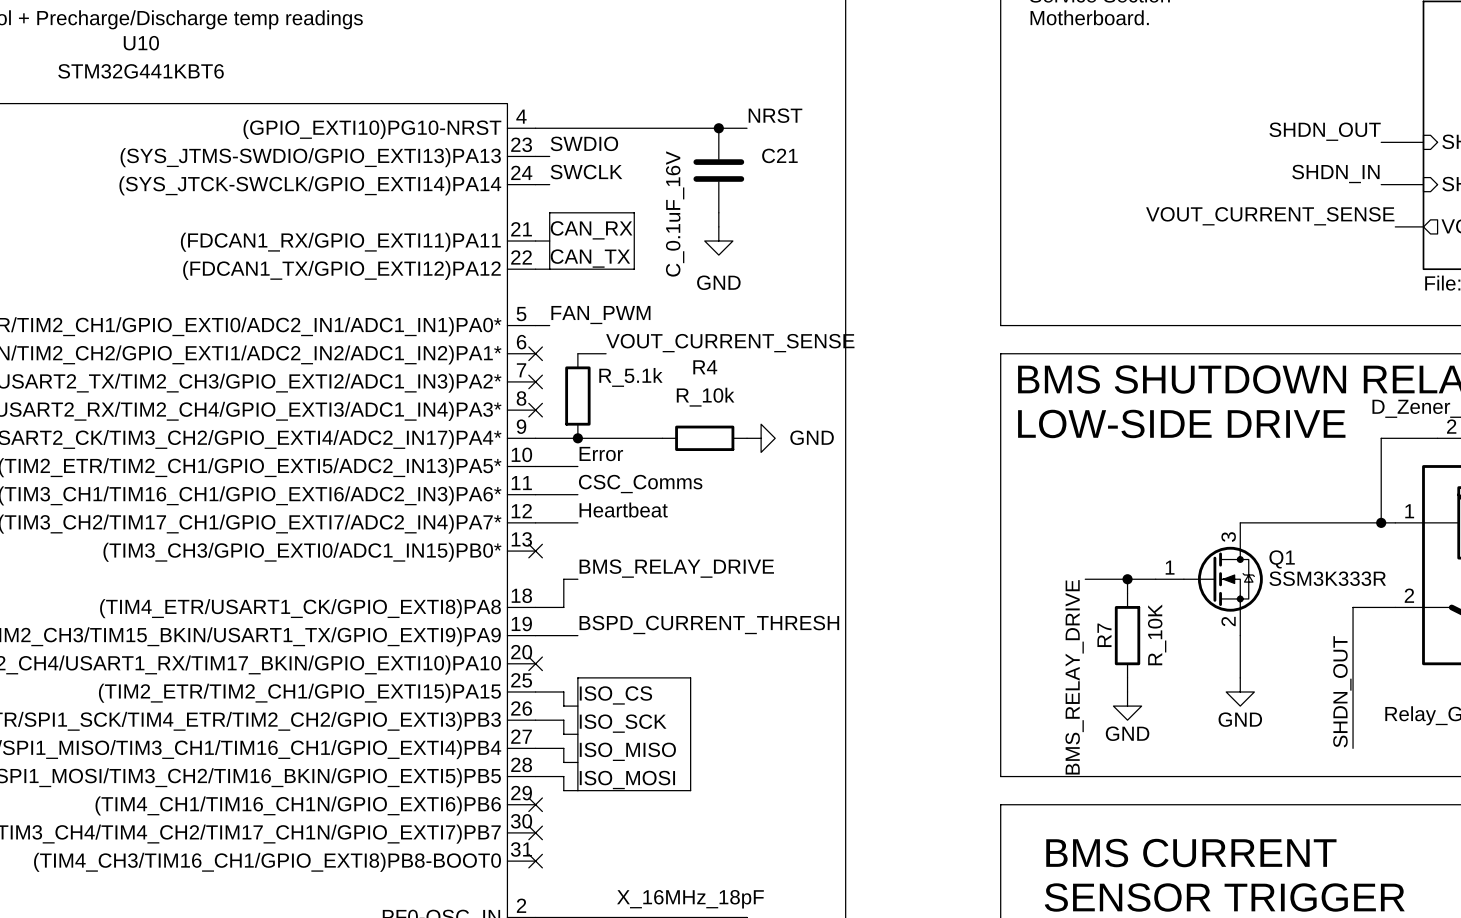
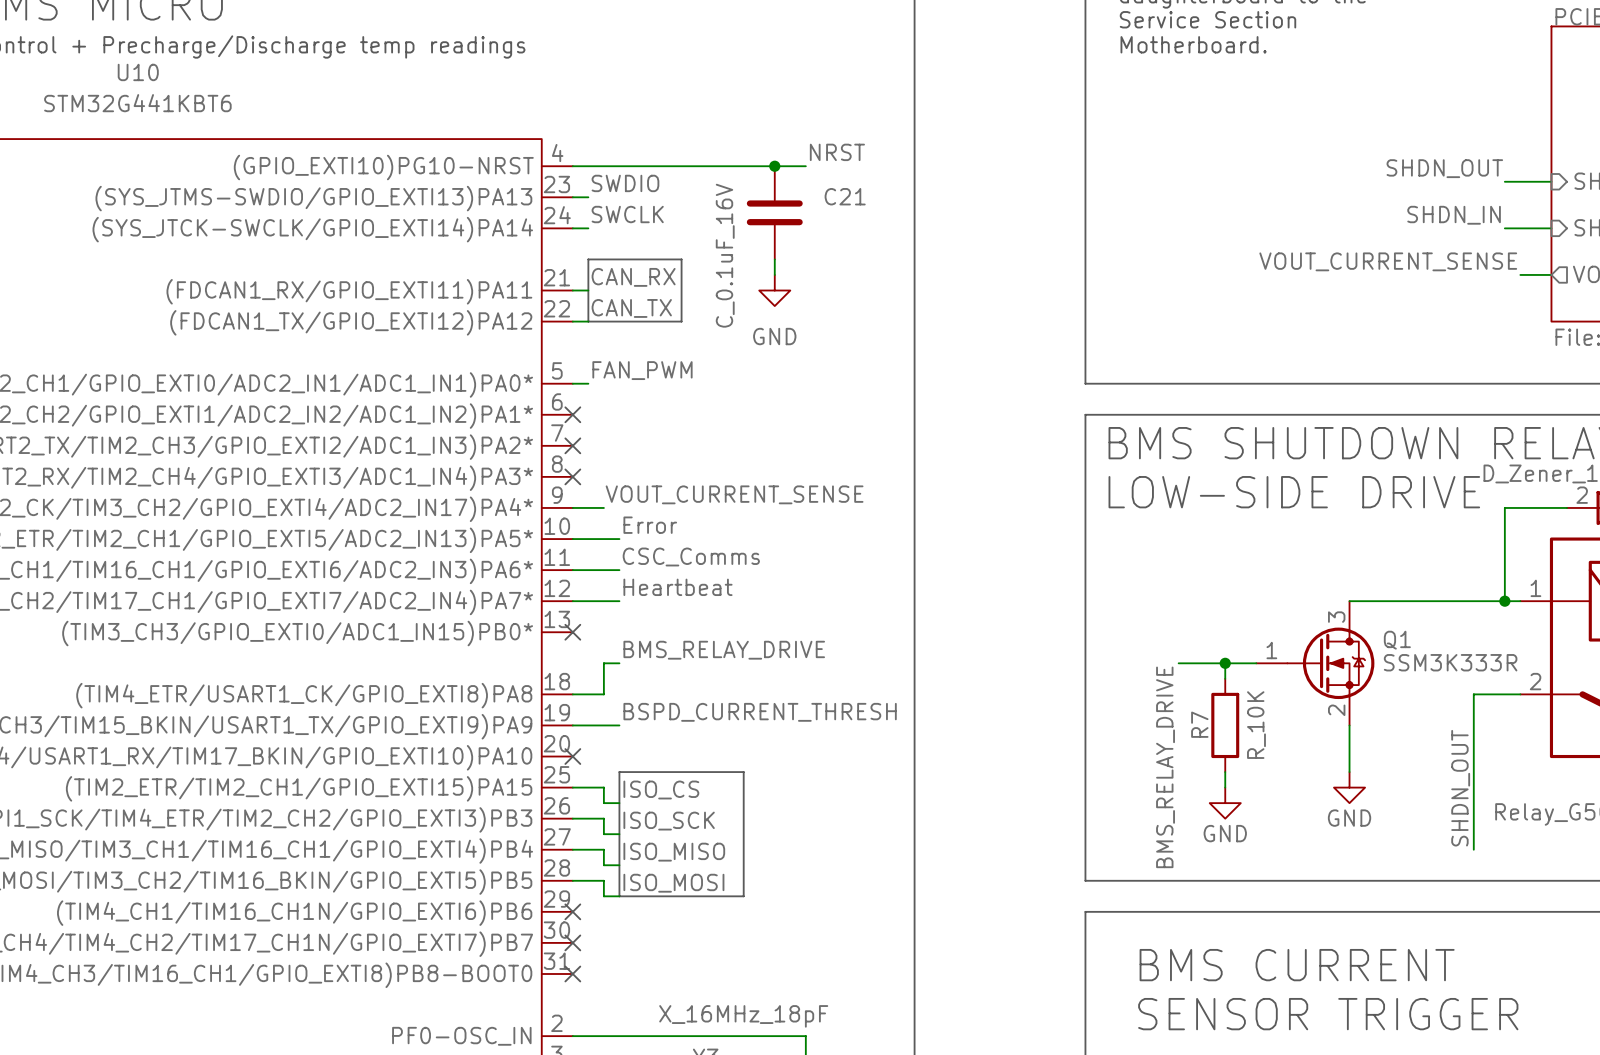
label position: VOUT_CURRENT_SENSE (730, 343) -> VOUT_CURRENT_SENSE (734, 494)
wire: (577, 353) (606, 353) -> none
part: R_5.1k (577, 396) -> none
wire: (563, 438) (662, 438) -> none
junction: (577, 438) -> none
R4: R_10k (704, 438) -> none
power symbol: GND (761, 438) -> none

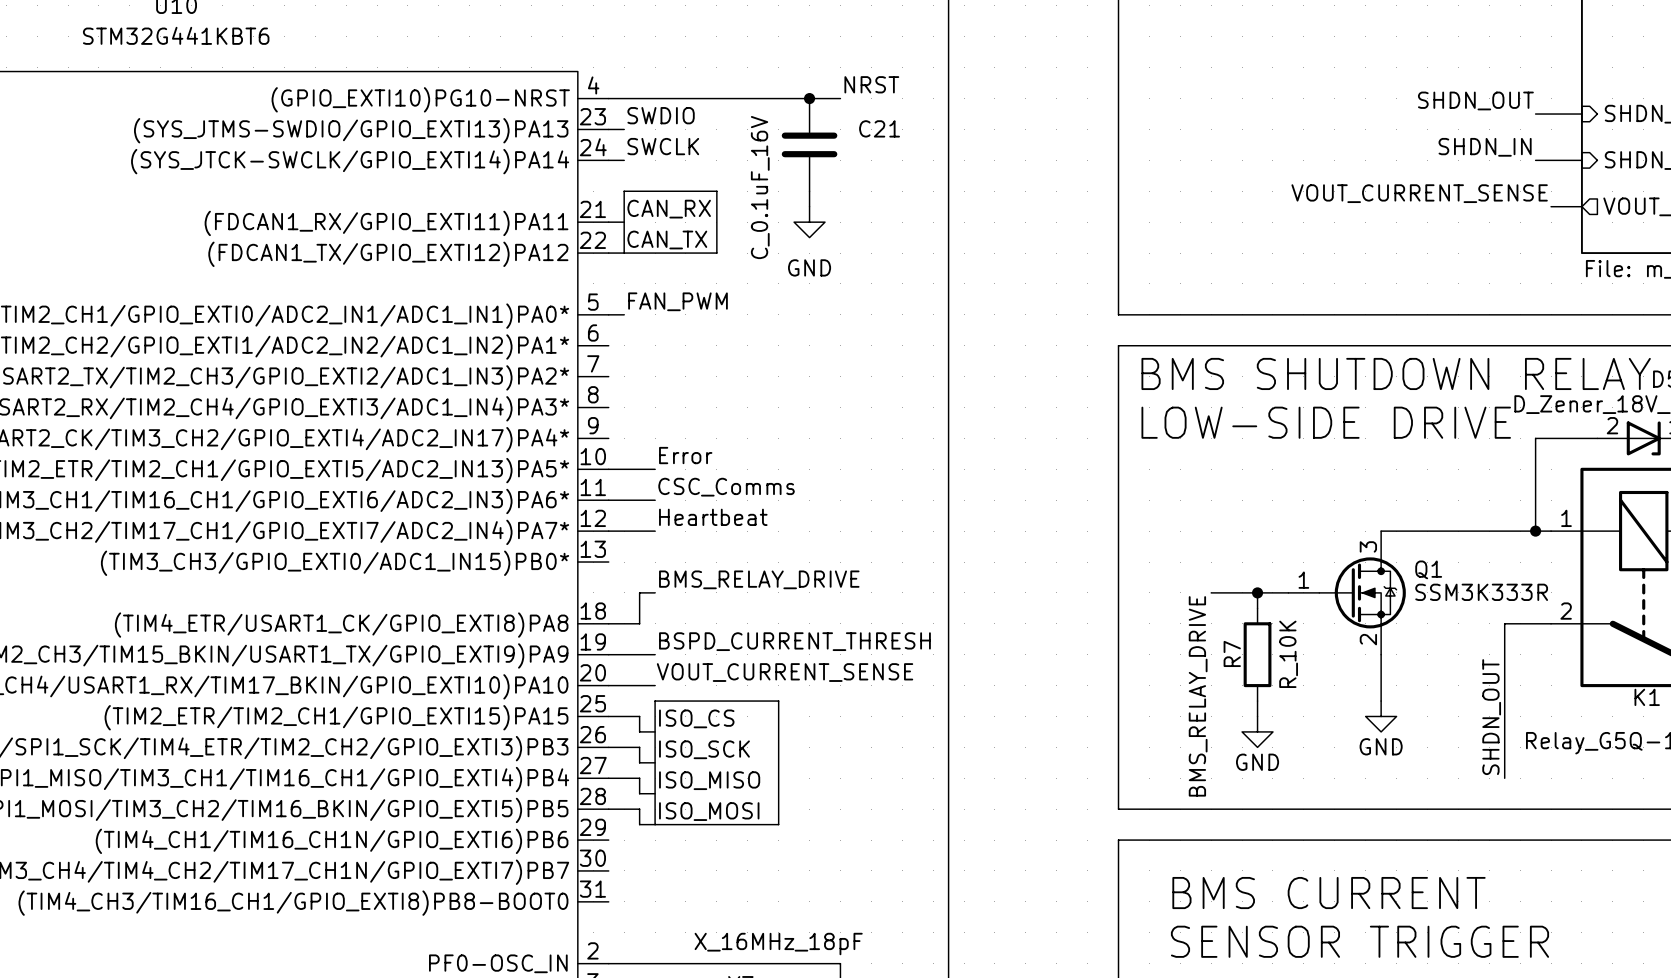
no-connect mark: (572, 414) -> none
no-connect mark: (572, 445) -> none
no-connect mark: (572, 476) -> none
label position: VOUT_CURRENT_SENSE (734, 494) -> VOUT_CURRENT_SENSE (785, 672)
wire: (572, 507) (603, 507) -> none
no-connect mark: (572, 632) -> none
wire: none -> (608, 685) (655, 685)
no-connect mark: (572, 756) -> none
no-connect mark: (572, 911) -> none
no-connect mark: (572, 942) -> none
no-connect mark: (572, 973) -> none

